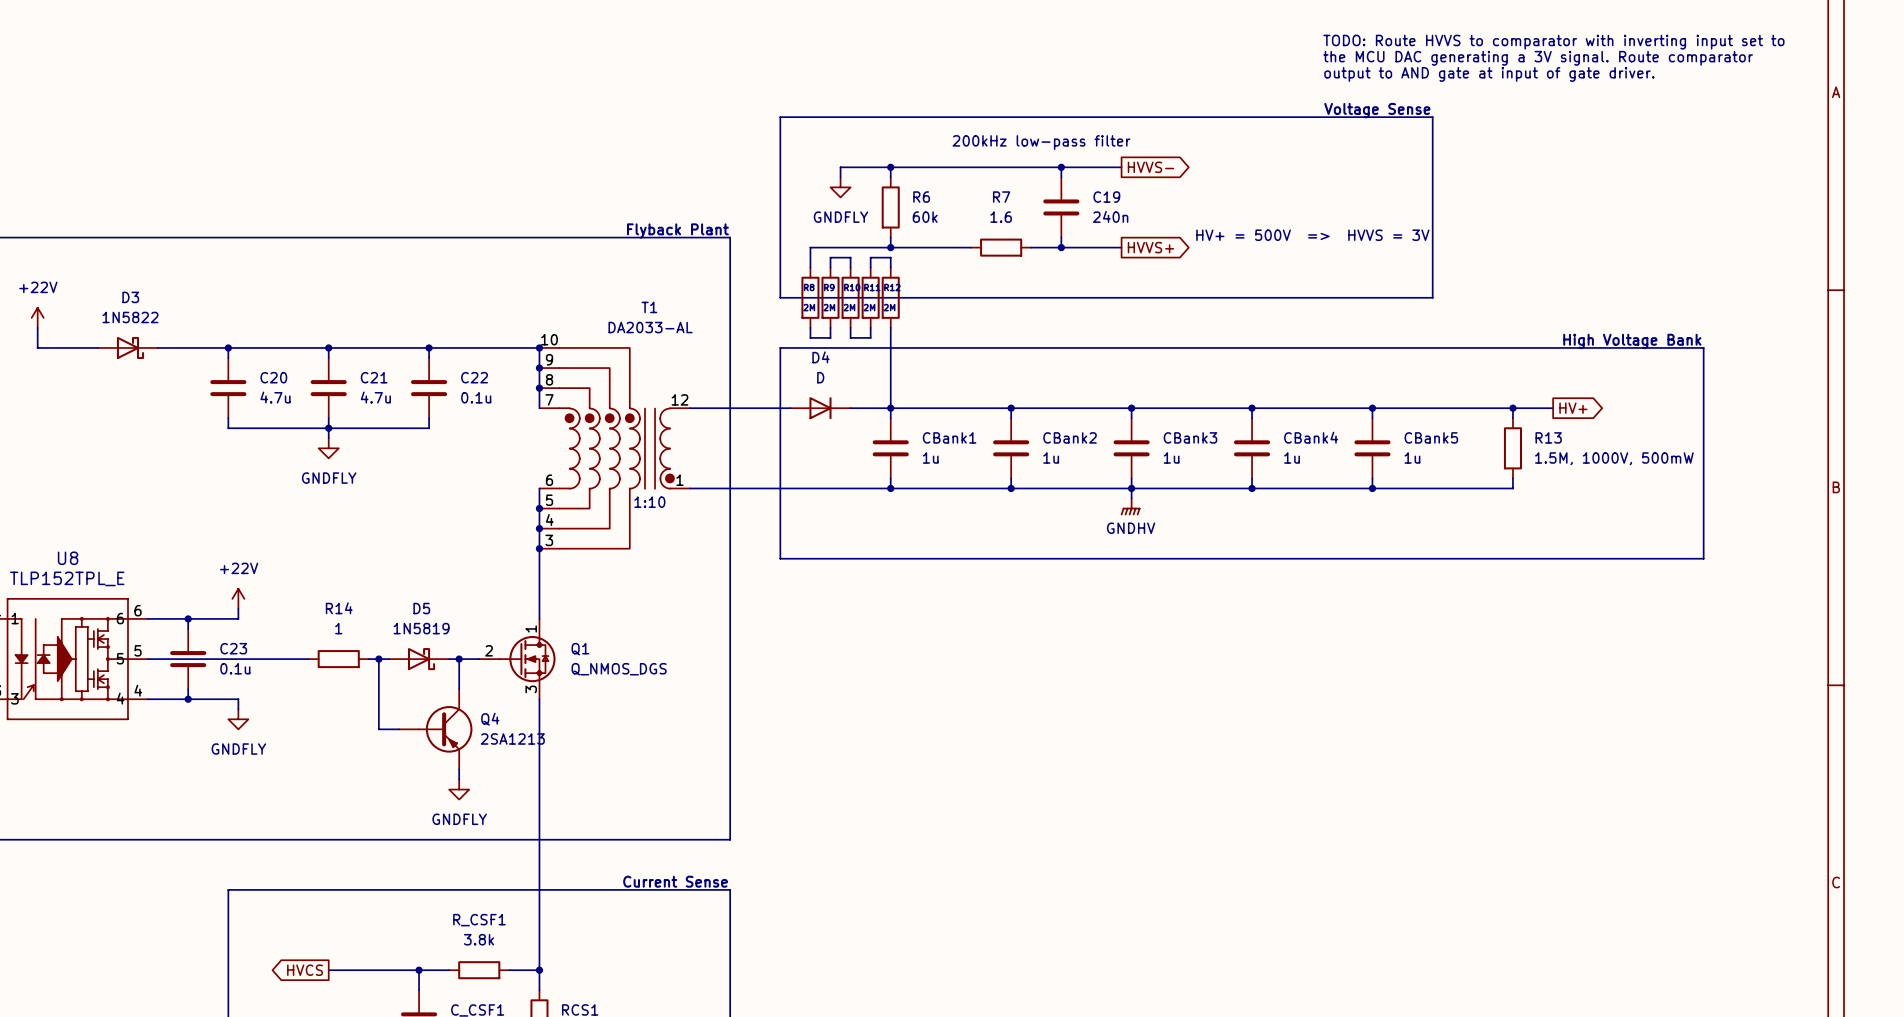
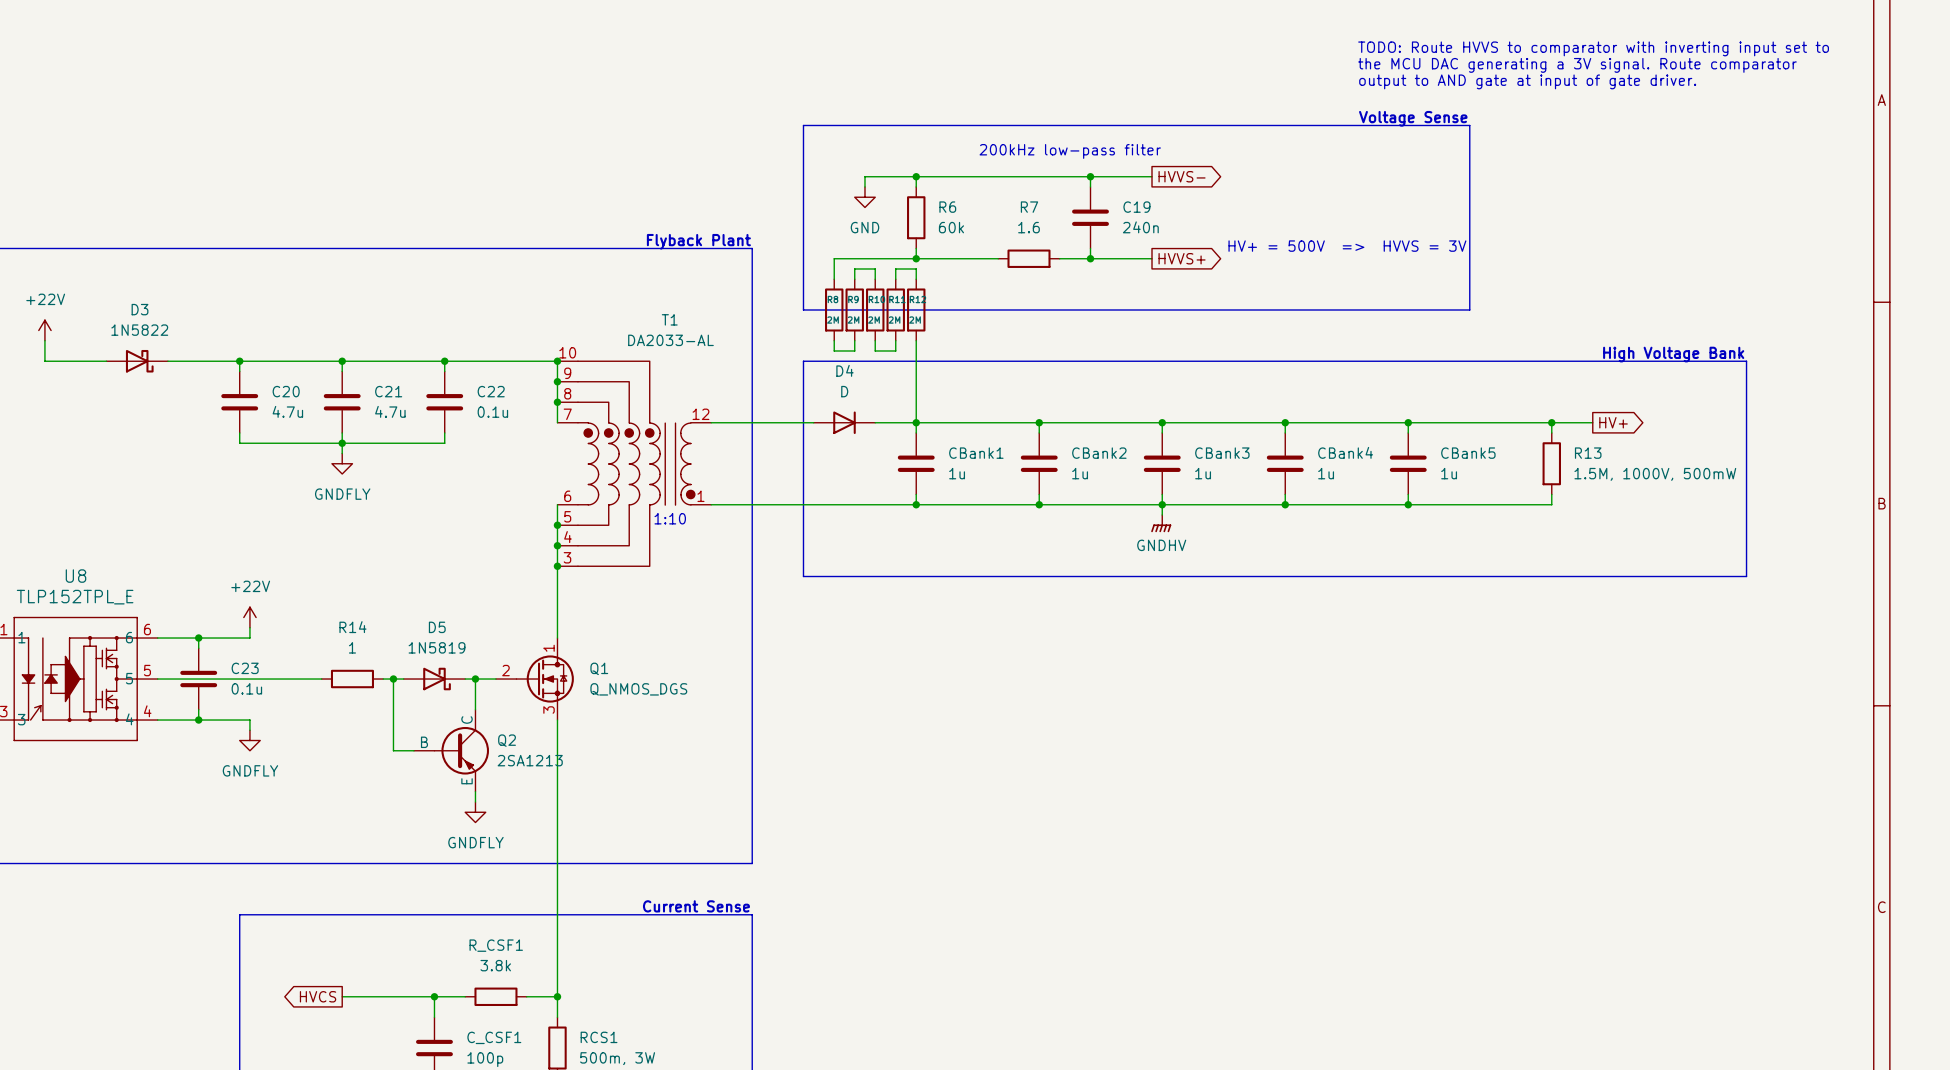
power symbol: GNDFLY (840, 187) -> GND (864, 197)
Q4 pin name: none -> C (467, 720)
Q4 name: Q4 (490, 719) -> Q2 (507, 740)
Q4 pin name: none -> B (424, 742)
Q4 pin name: none -> E (467, 781)

